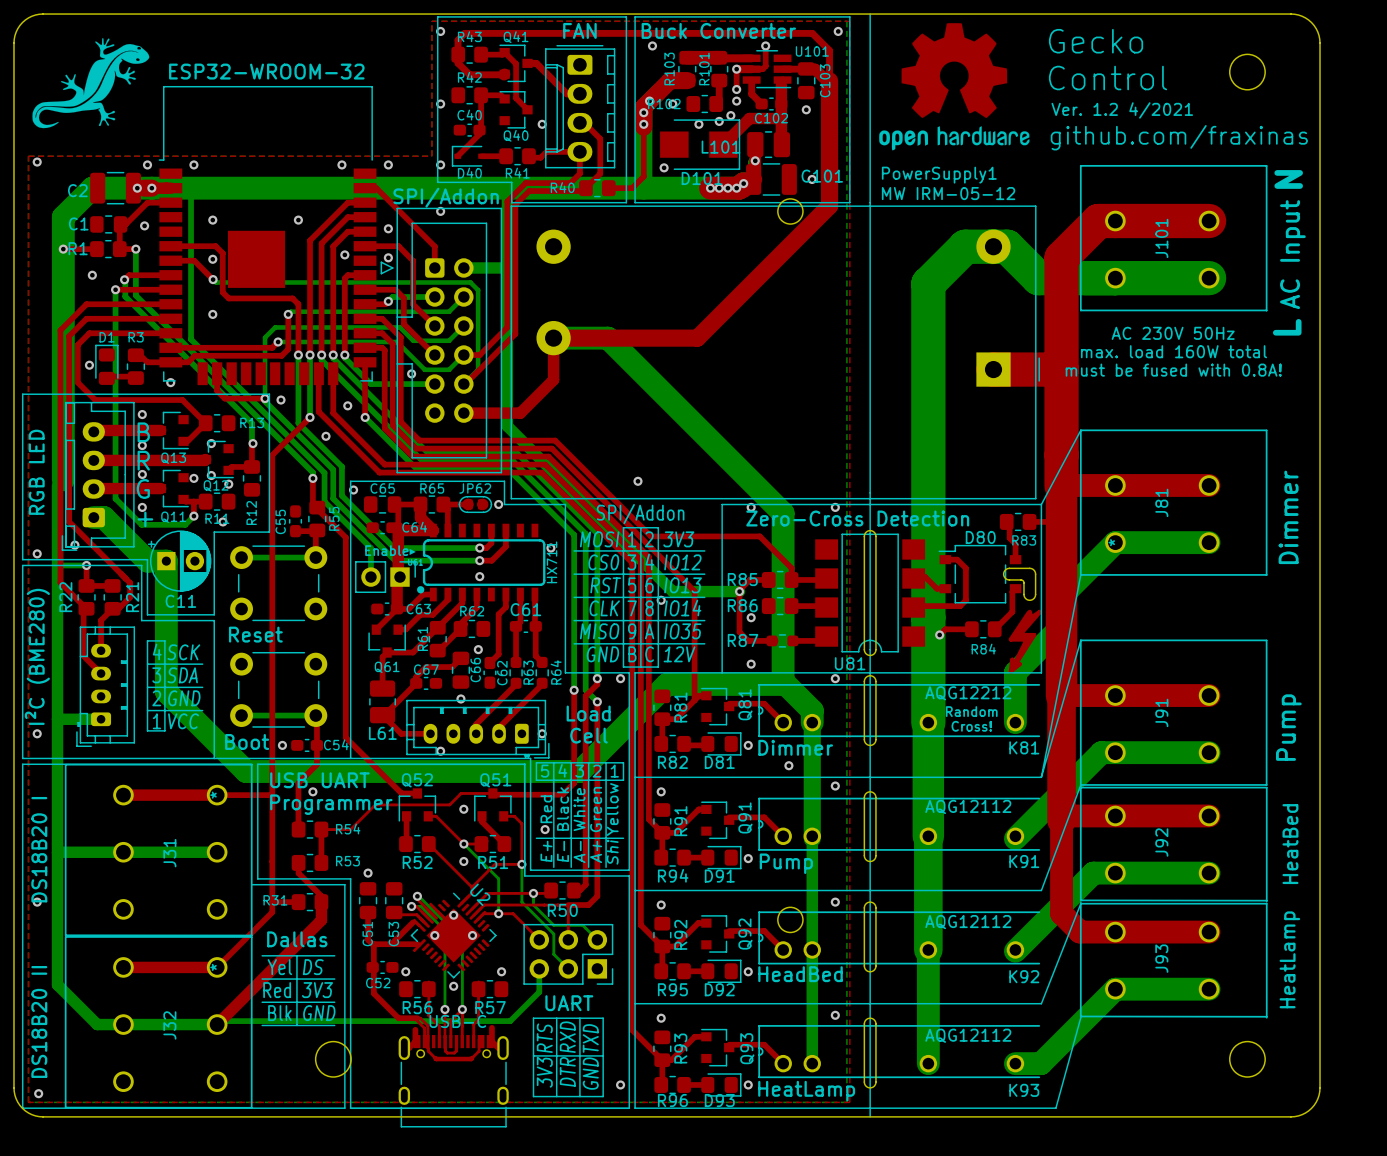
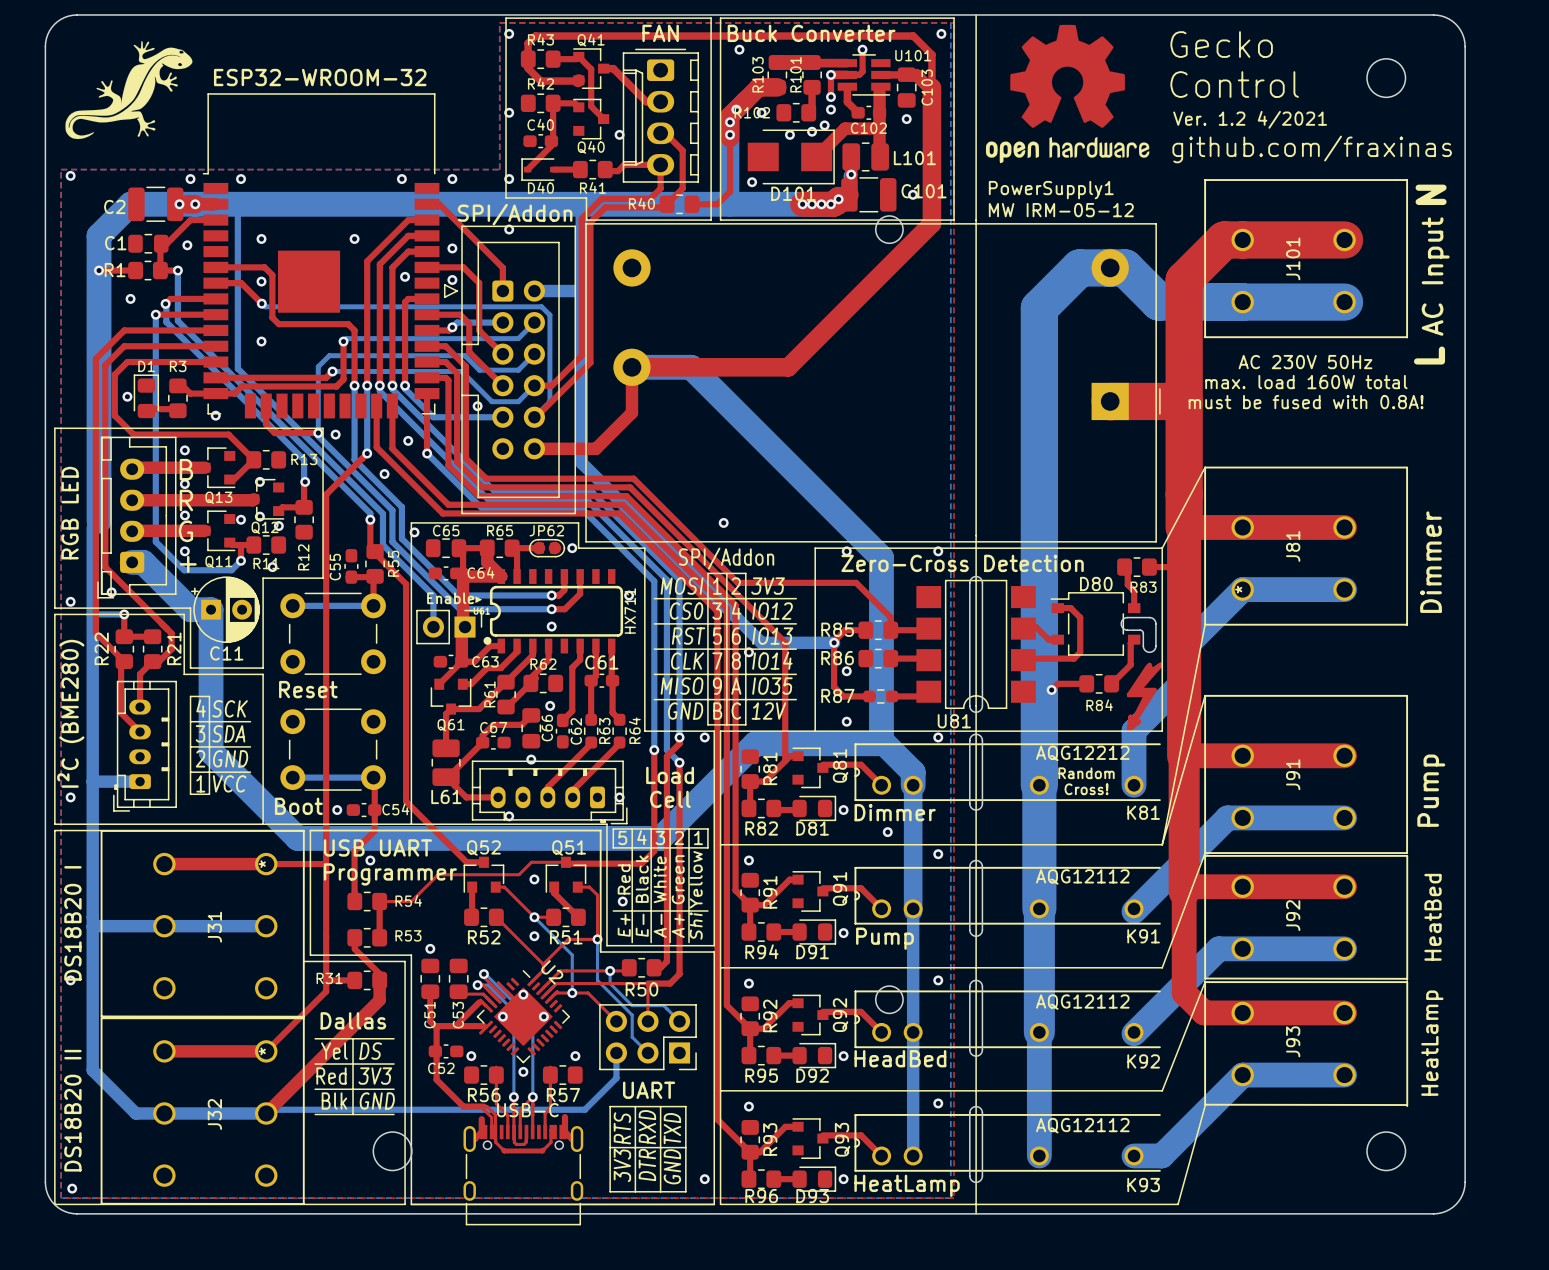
L101 name position: L101 (720, 147) -> L101 (914, 158)

